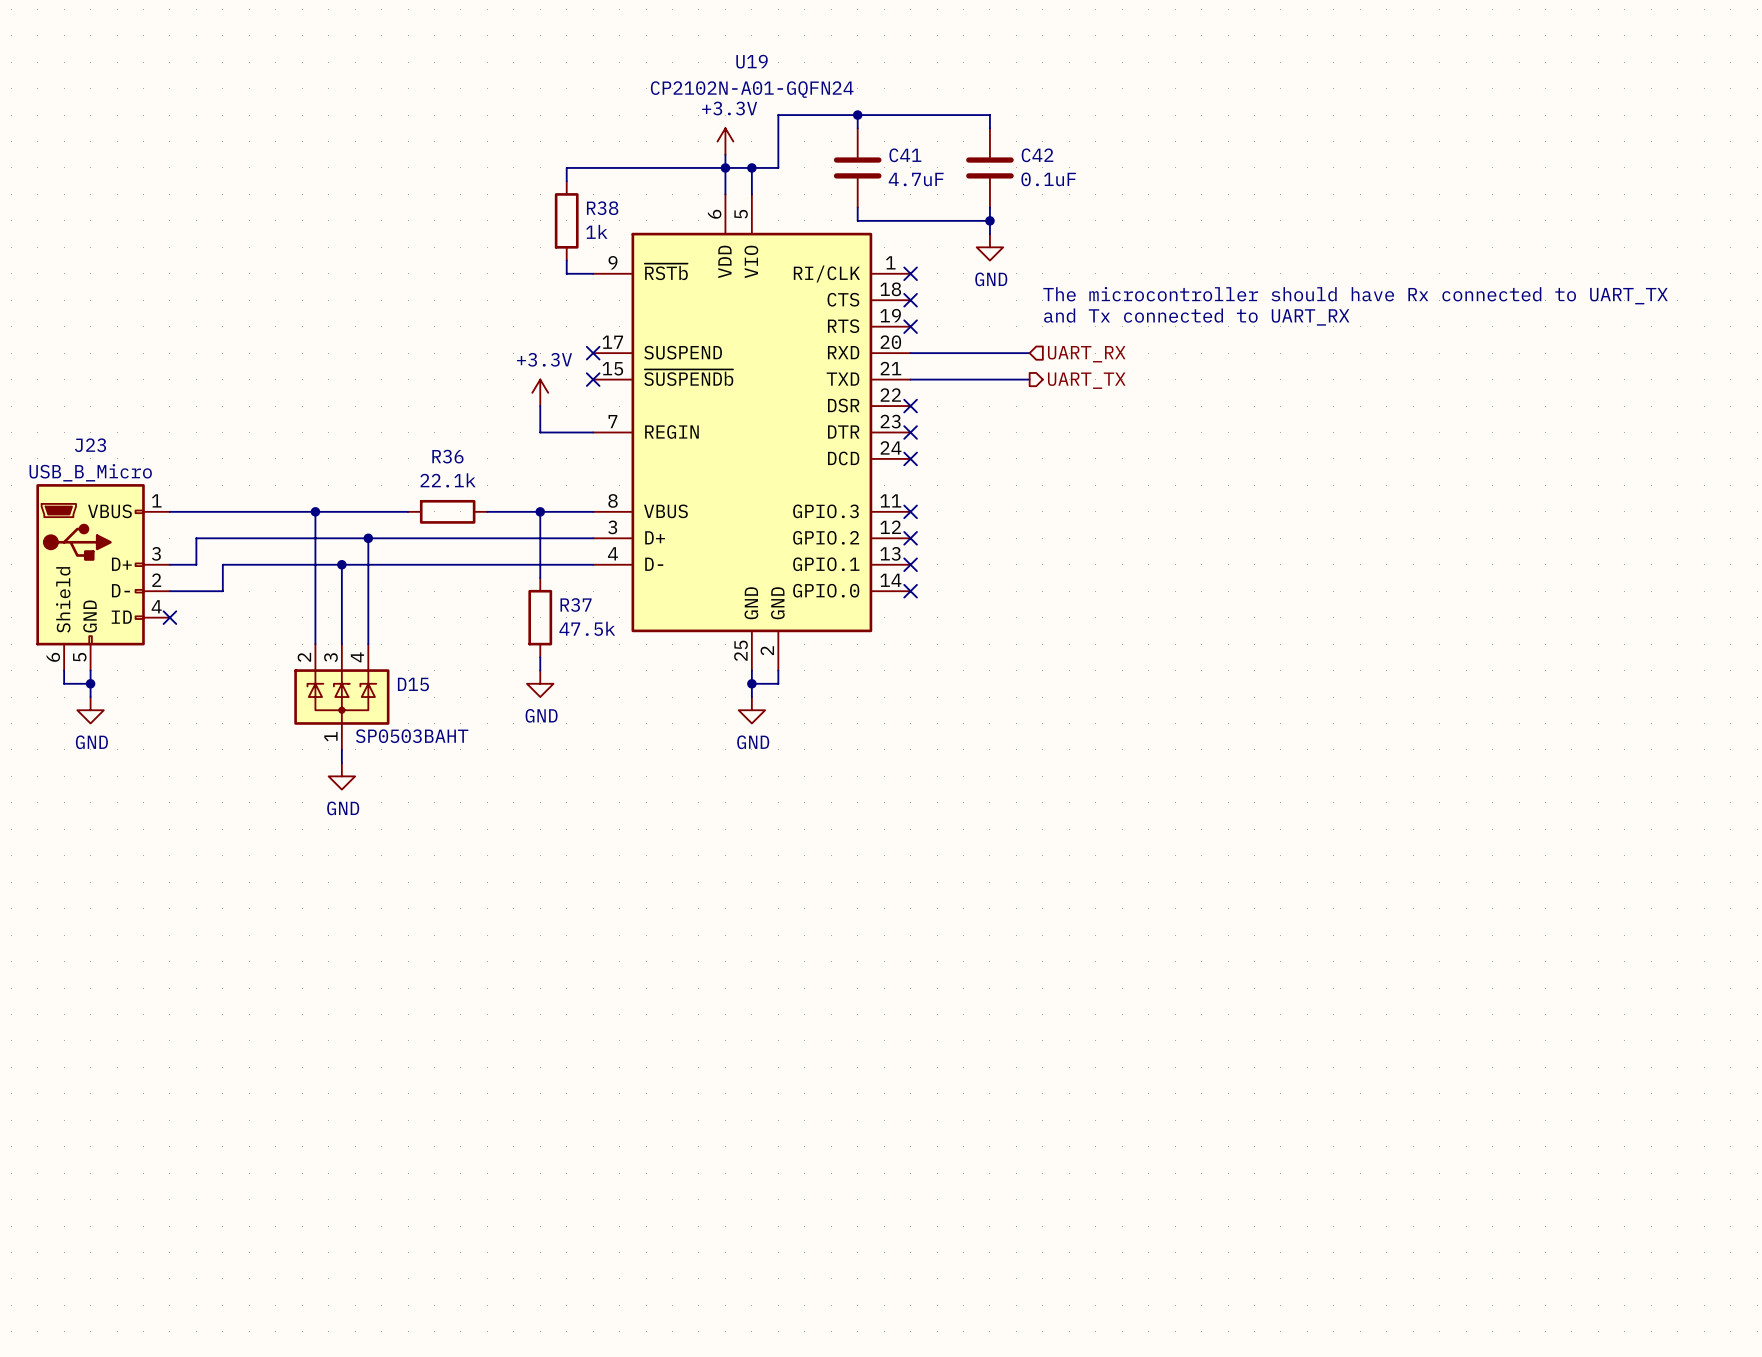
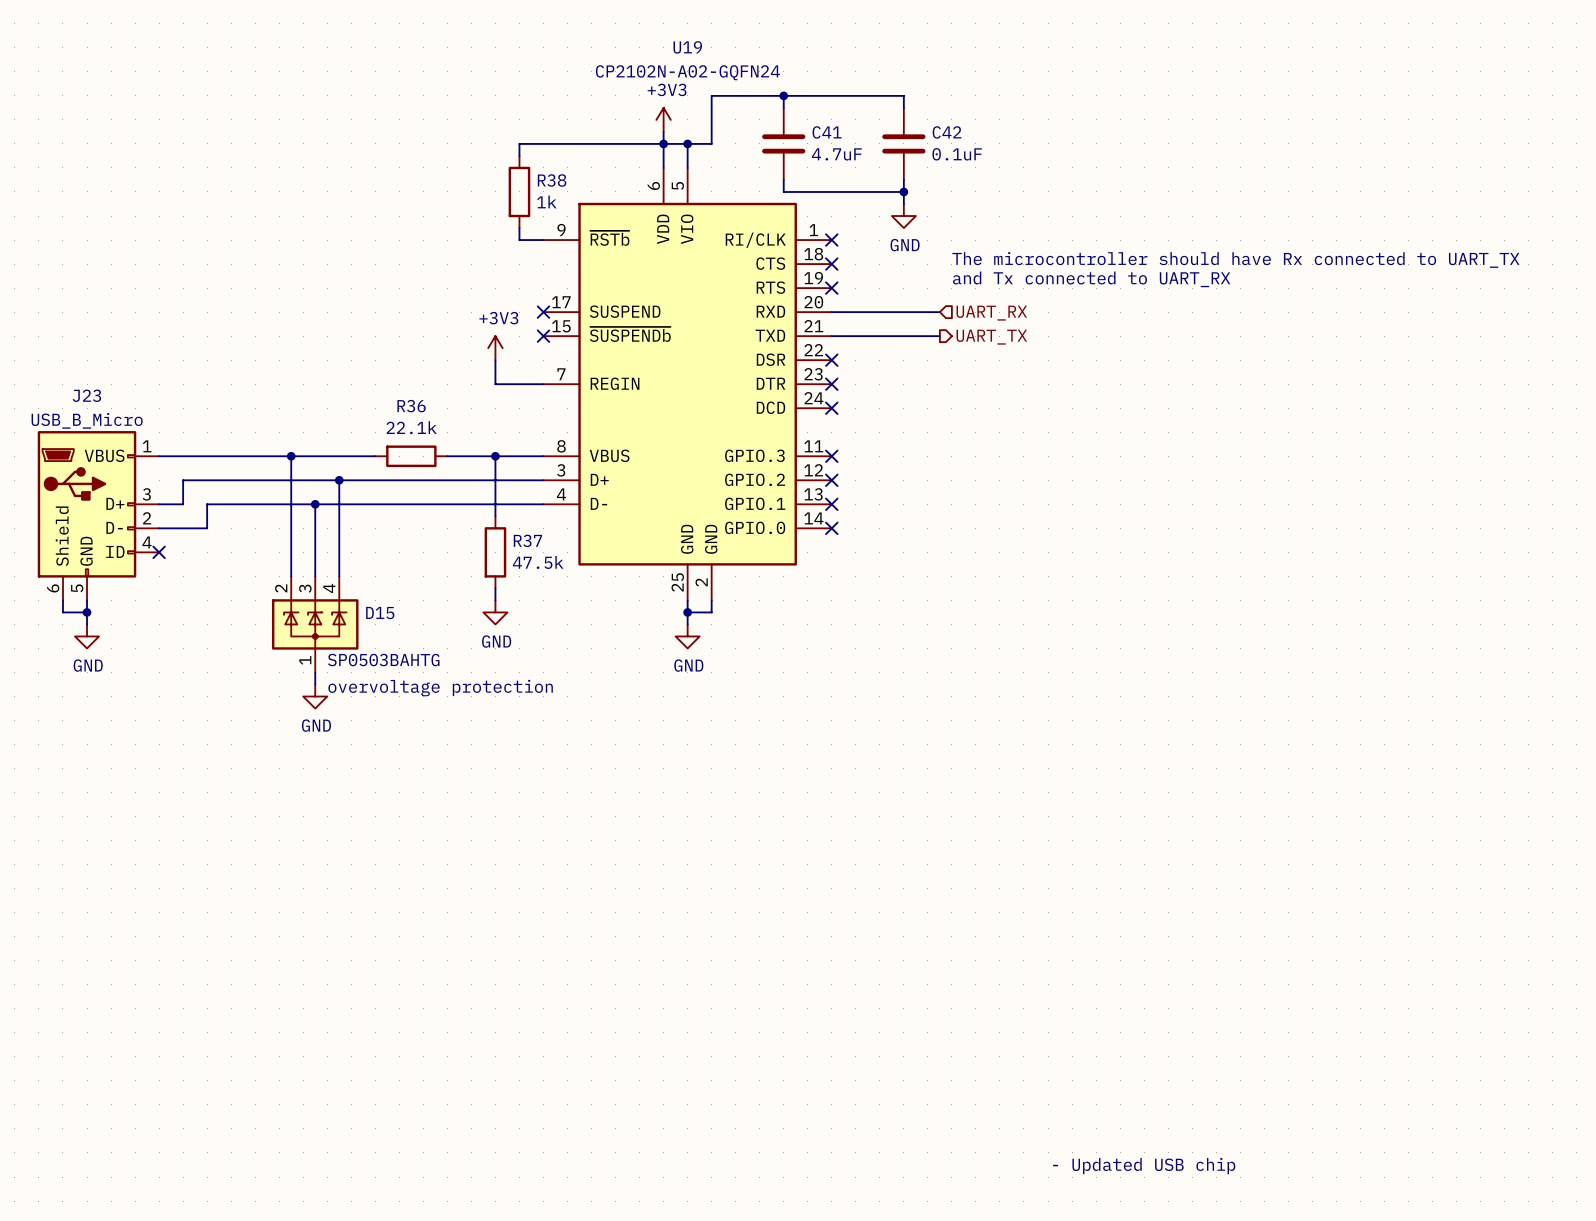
U19 value: CP2102N-A01-GQFN24 (752, 89) -> CP2102N-A02-GQFN24 (687, 72)
power symbol: +3.3V (725, 141) -> +3V3 (663, 119)
power symbol: +3.3V (540, 392) -> +3V3 (495, 348)
D15 value: SP0503BAHT (412, 736) -> SP0503BAHTG (383, 660)
text: none -> overvoltage protection (440, 688)
text: none -> - Updated USB chip (1144, 1166)

